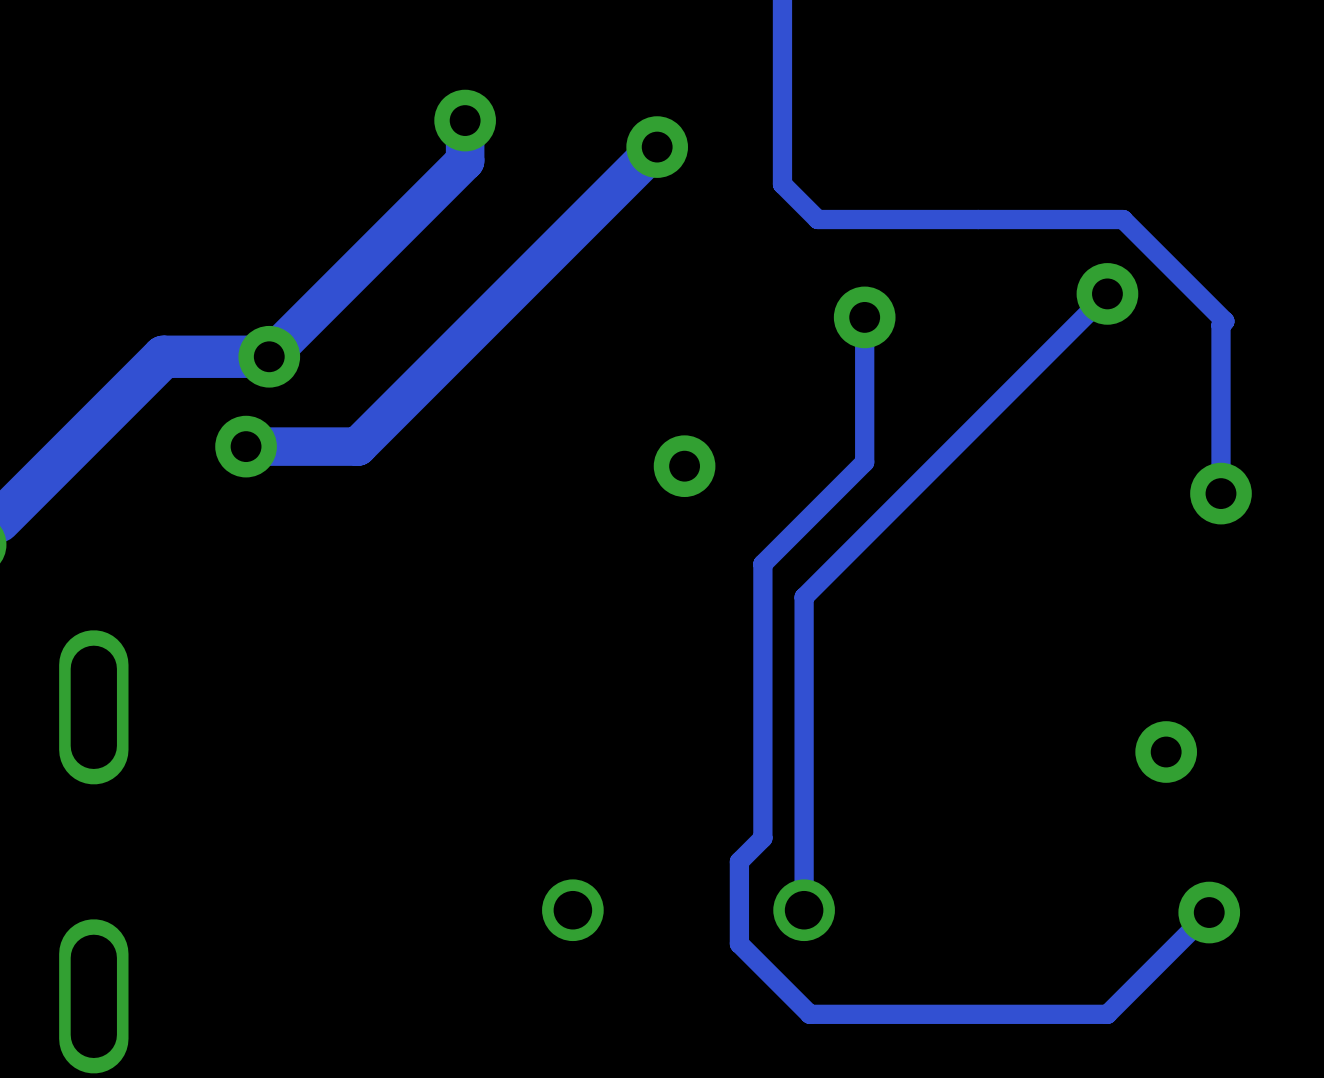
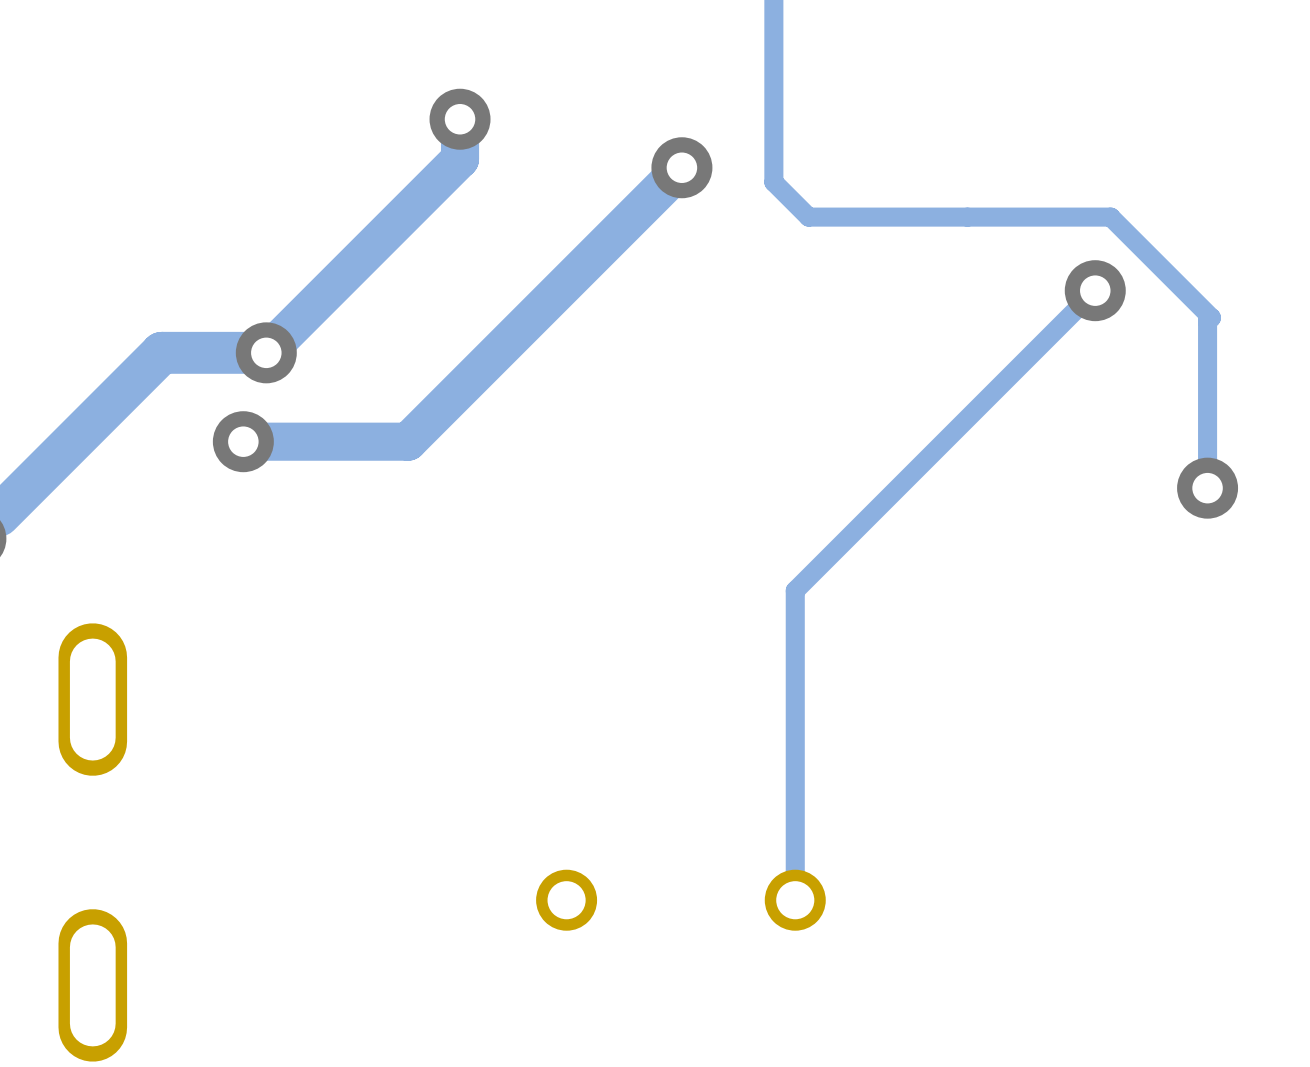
track: (657, 147) (357, 446) -> (681, 167) (407, 441) (353, 441)
via position: (657, 147) -> (681, 167)
track: (864, 317) (864, 462) (762, 564) (762, 838) (739, 861) (739, 943) (809, 1014) (1107, 1014) (1209, 912) -> none
via: (864, 317) -> none
via: (684, 466) -> none
via: (1166, 752) -> none
via: (1209, 912) -> none

